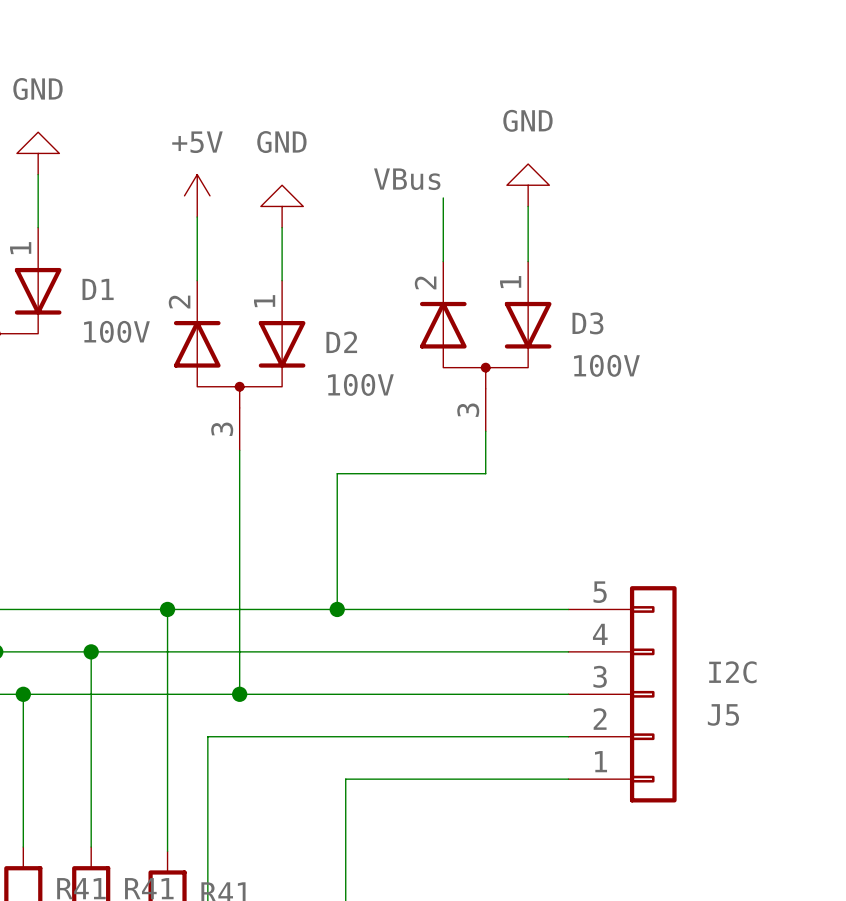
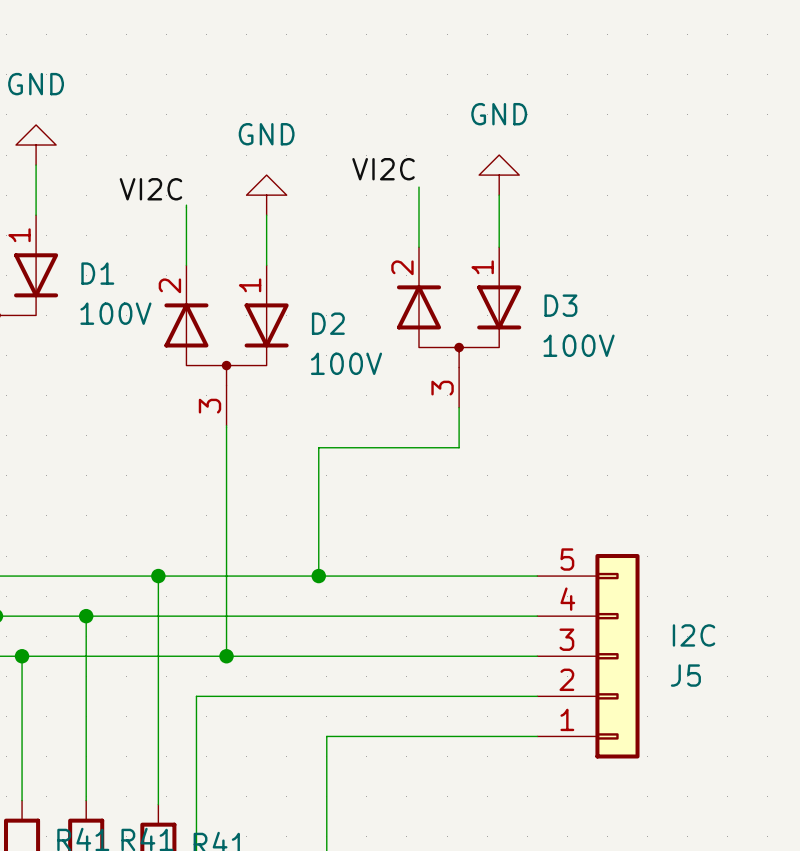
label: VBus (407, 179) -> VI2C (383, 169)
power symbol: +5V (197, 195) -> none
label: none -> VI2C (150, 189)

